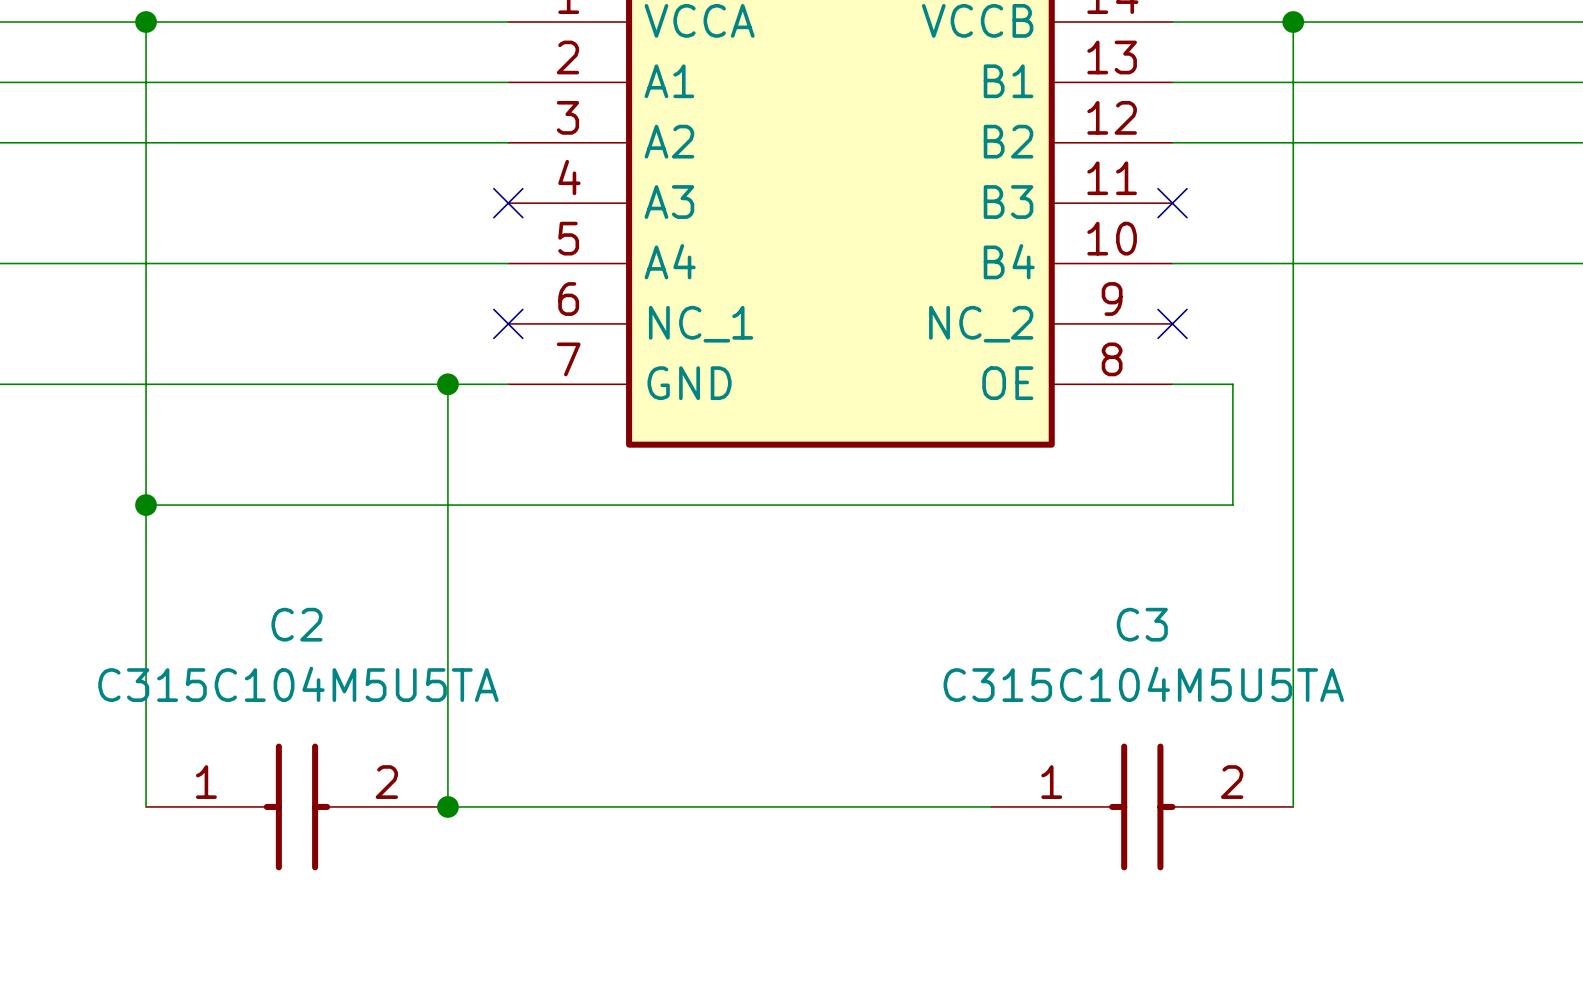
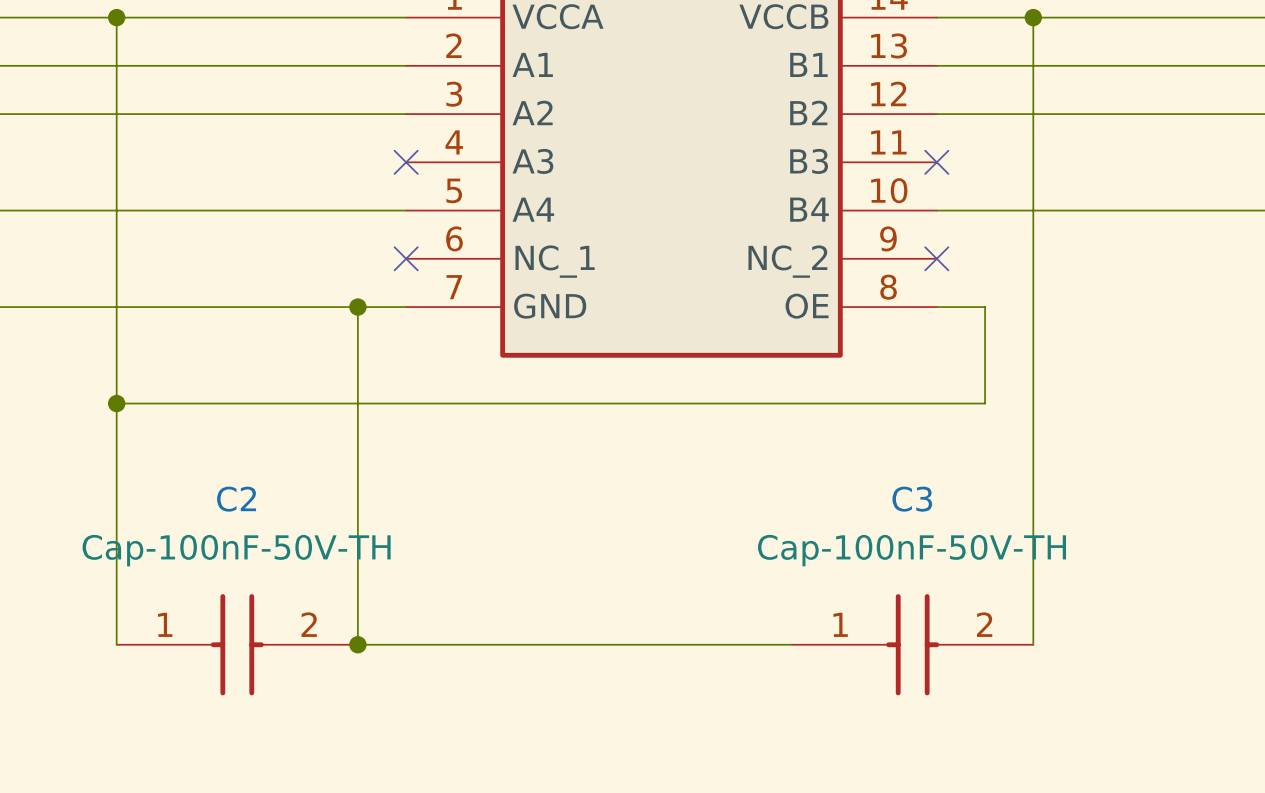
C2 value: C315C104M5U5TA (298, 684) -> Cap-100nF-50V-TH (236, 550)
C3 value: C315C104M5U5TA (1143, 684) -> Cap-100nF-50V-TH (912, 550)

